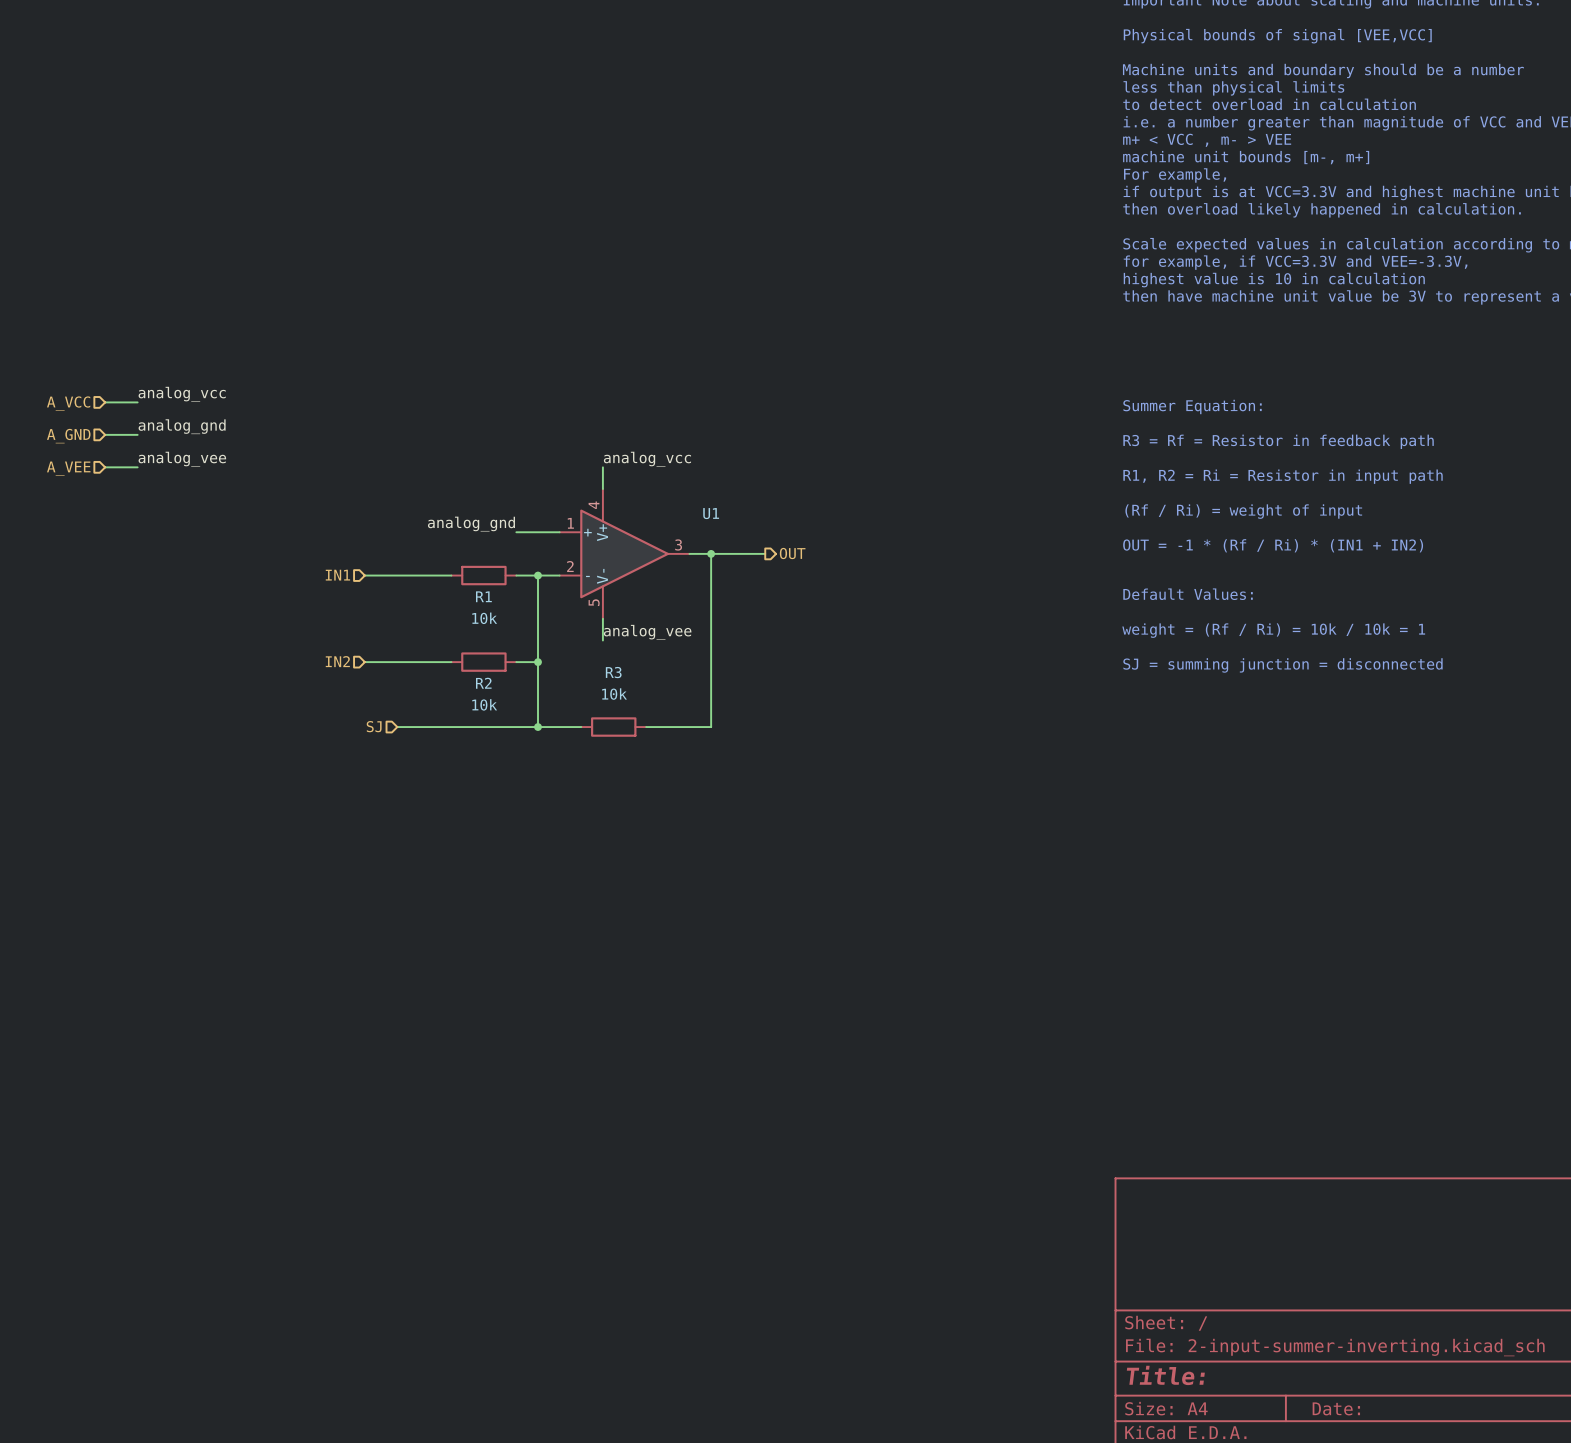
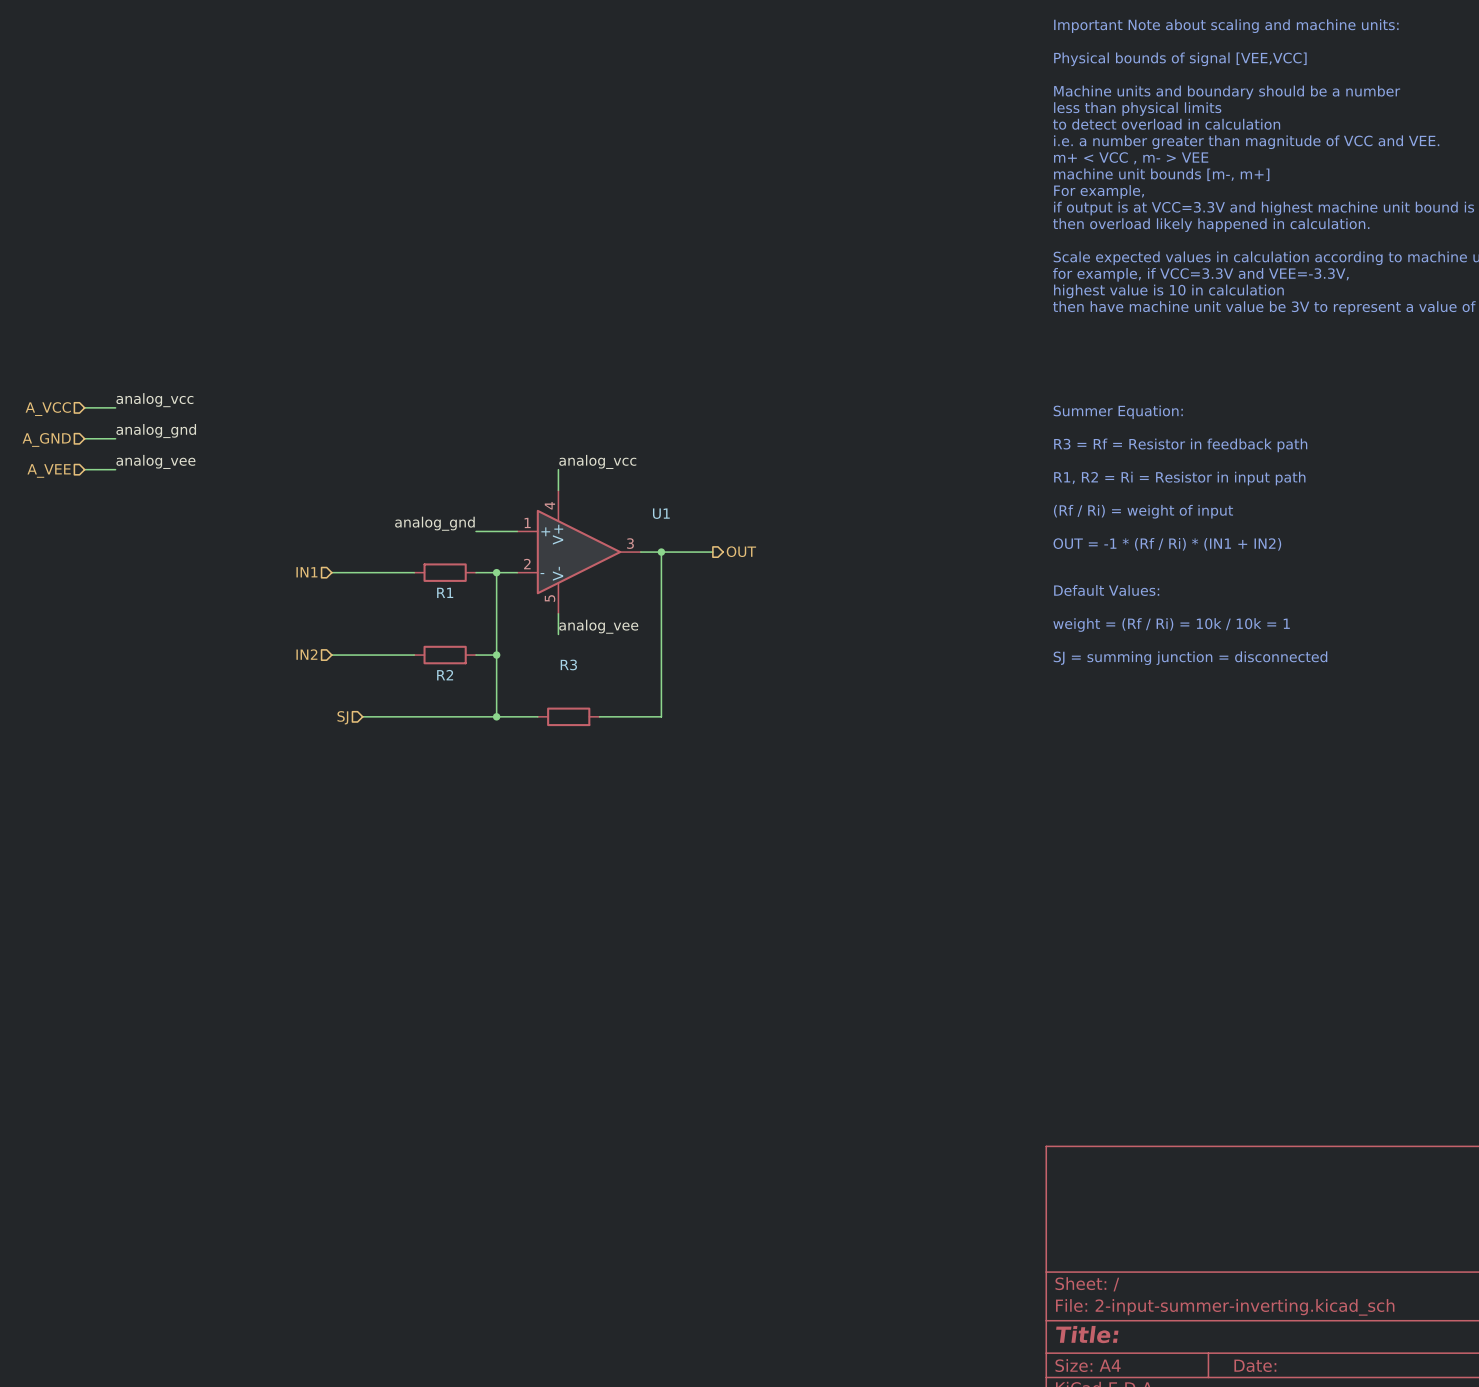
R1 value: 10k (484, 618) -> none
R3 value: 10k (614, 694) -> none
R2 value: 10k (484, 704) -> none

